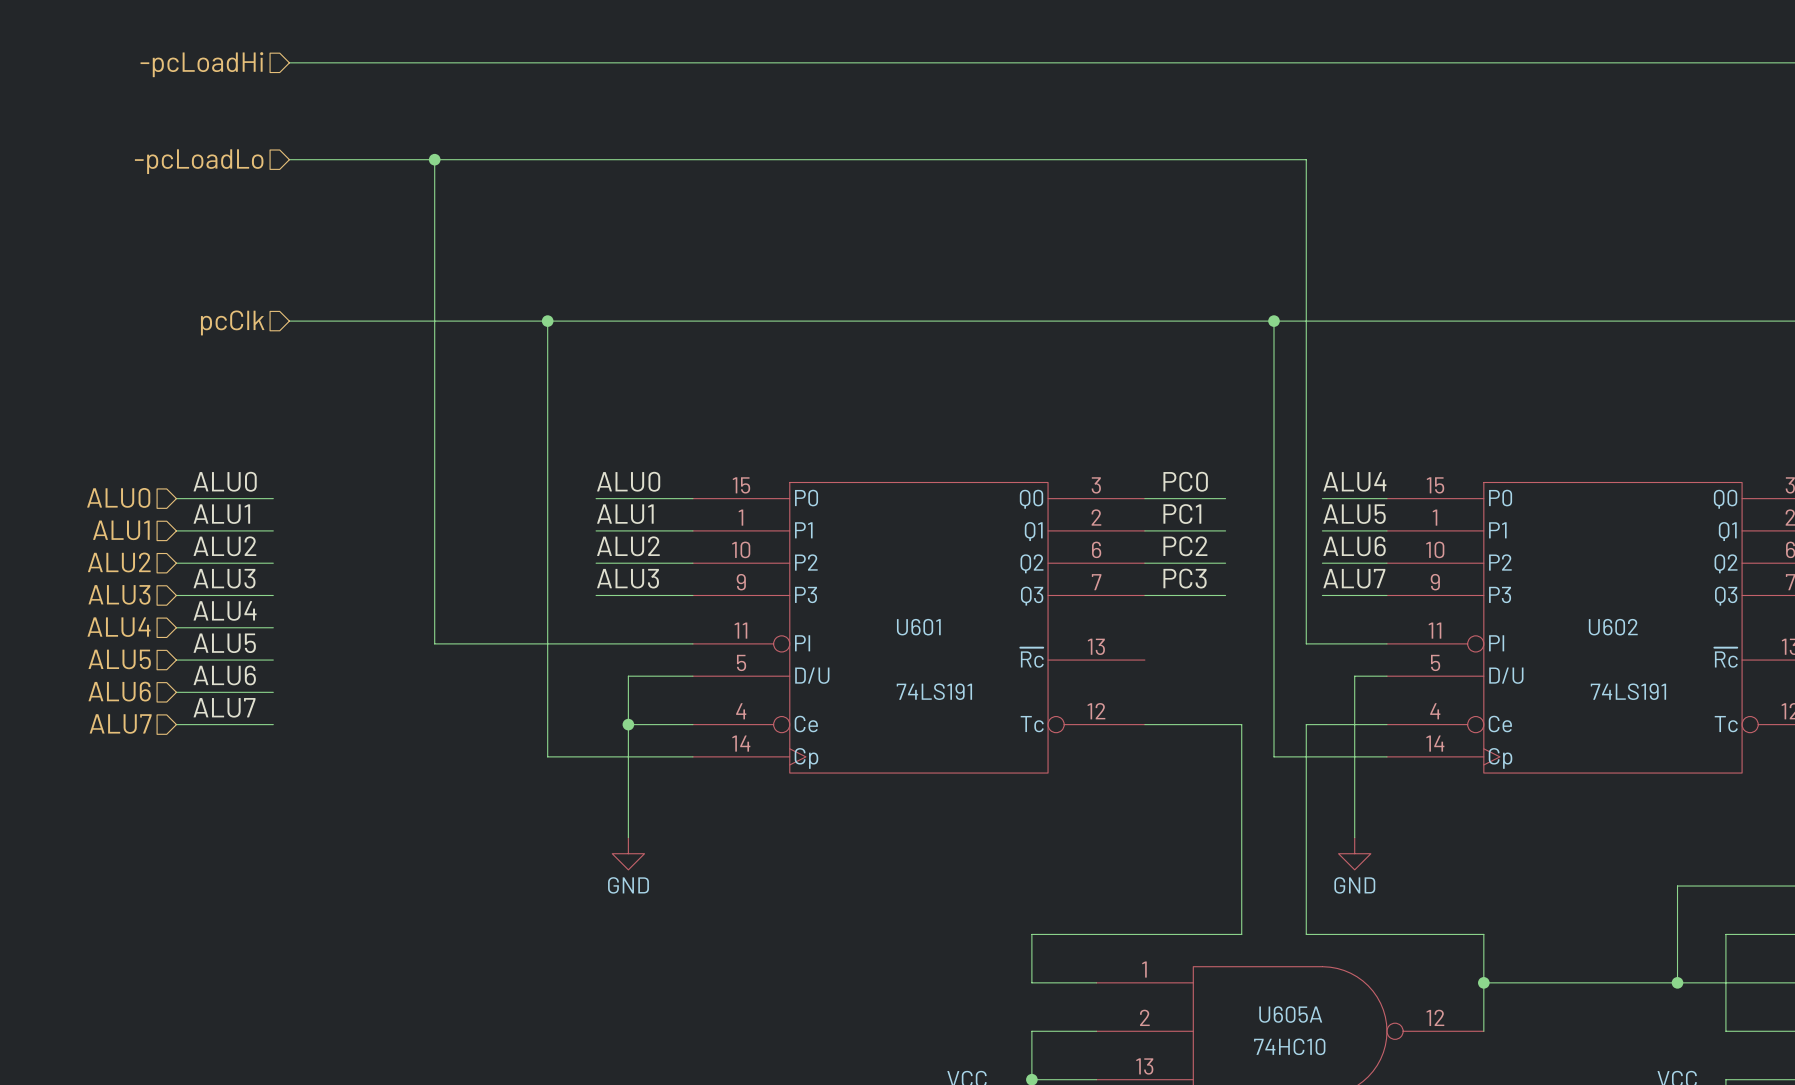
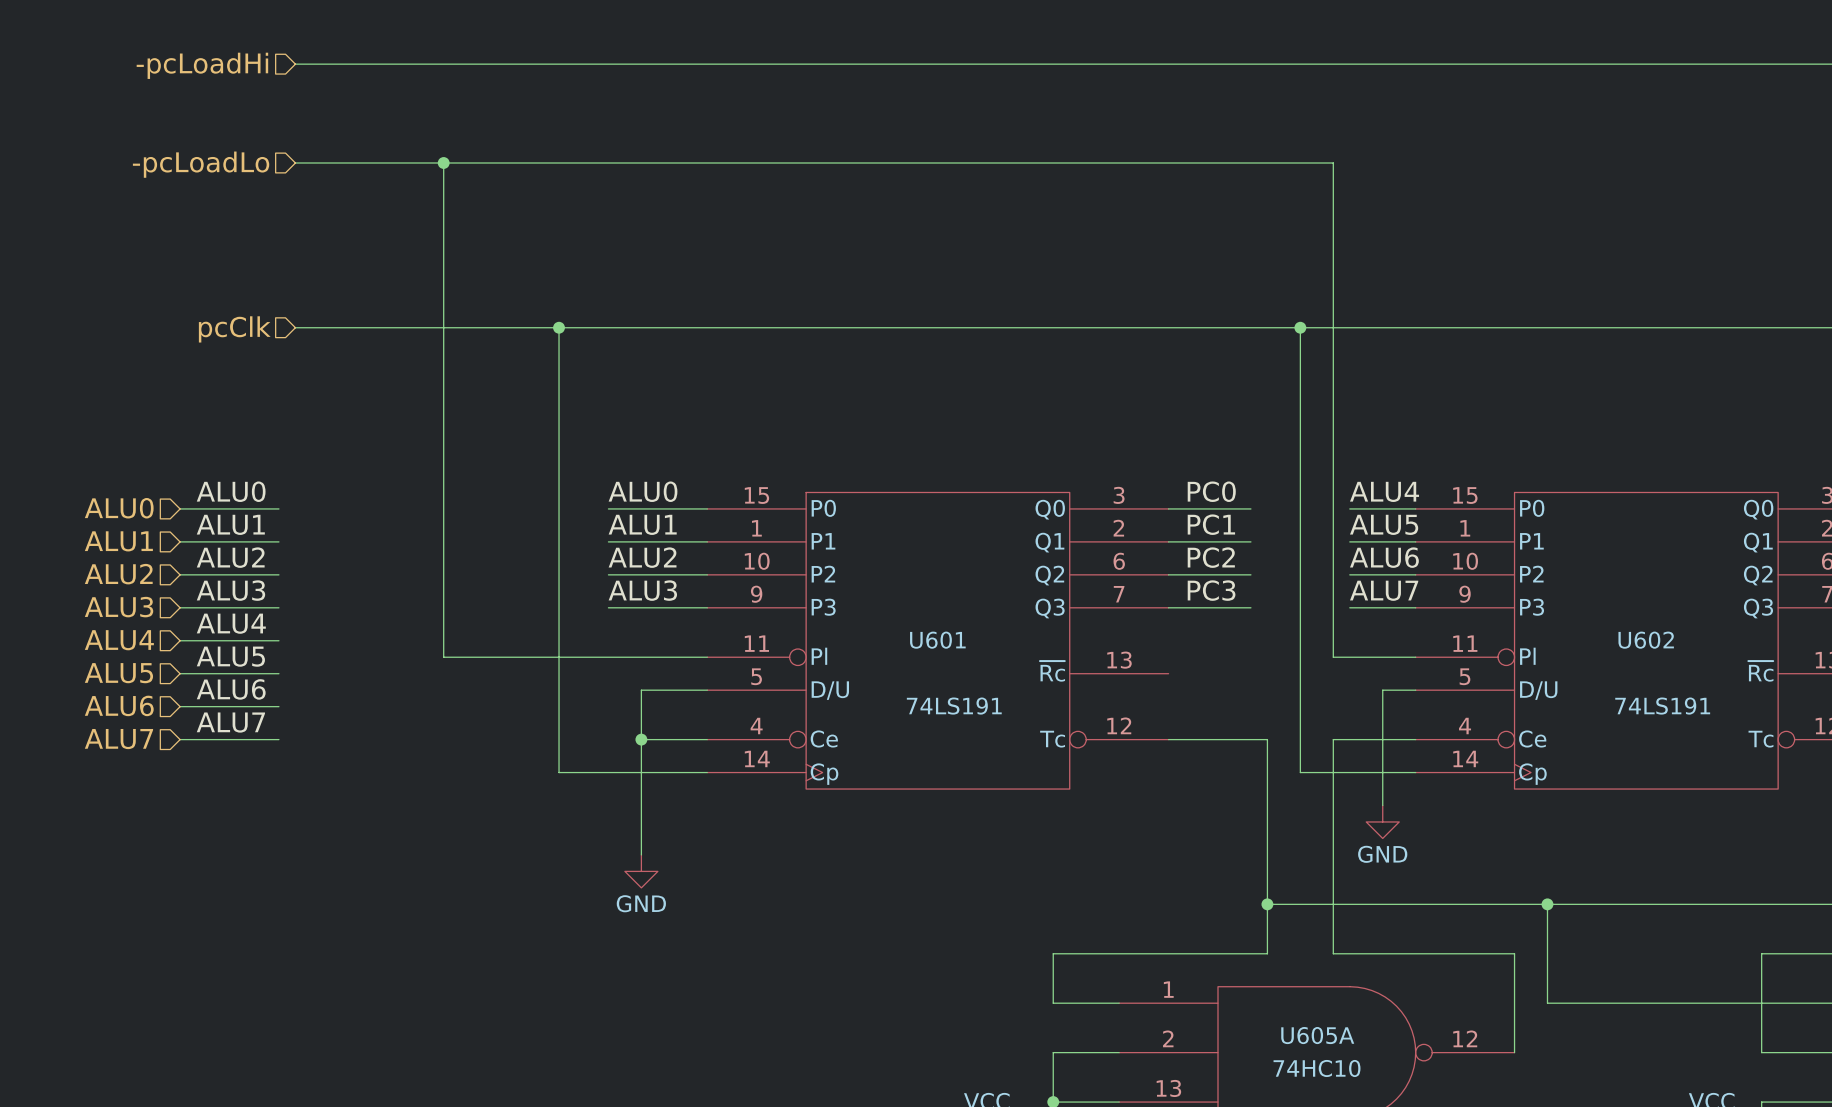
wire: (1354, 789) (1354, 837) -> none
power symbol position: GND (1354, 853) -> GND (1382, 821)
junction: none -> (1267, 904)
junction: none -> (1547, 904)
wire: (1677, 886) (1677, 982) -> (1712, 904) (1267, 904)
wire: (1483, 982) (1516, 982) -> (1547, 904) (1547, 1003)
junction: (1483, 982) -> none
junction: (1677, 982) -> none

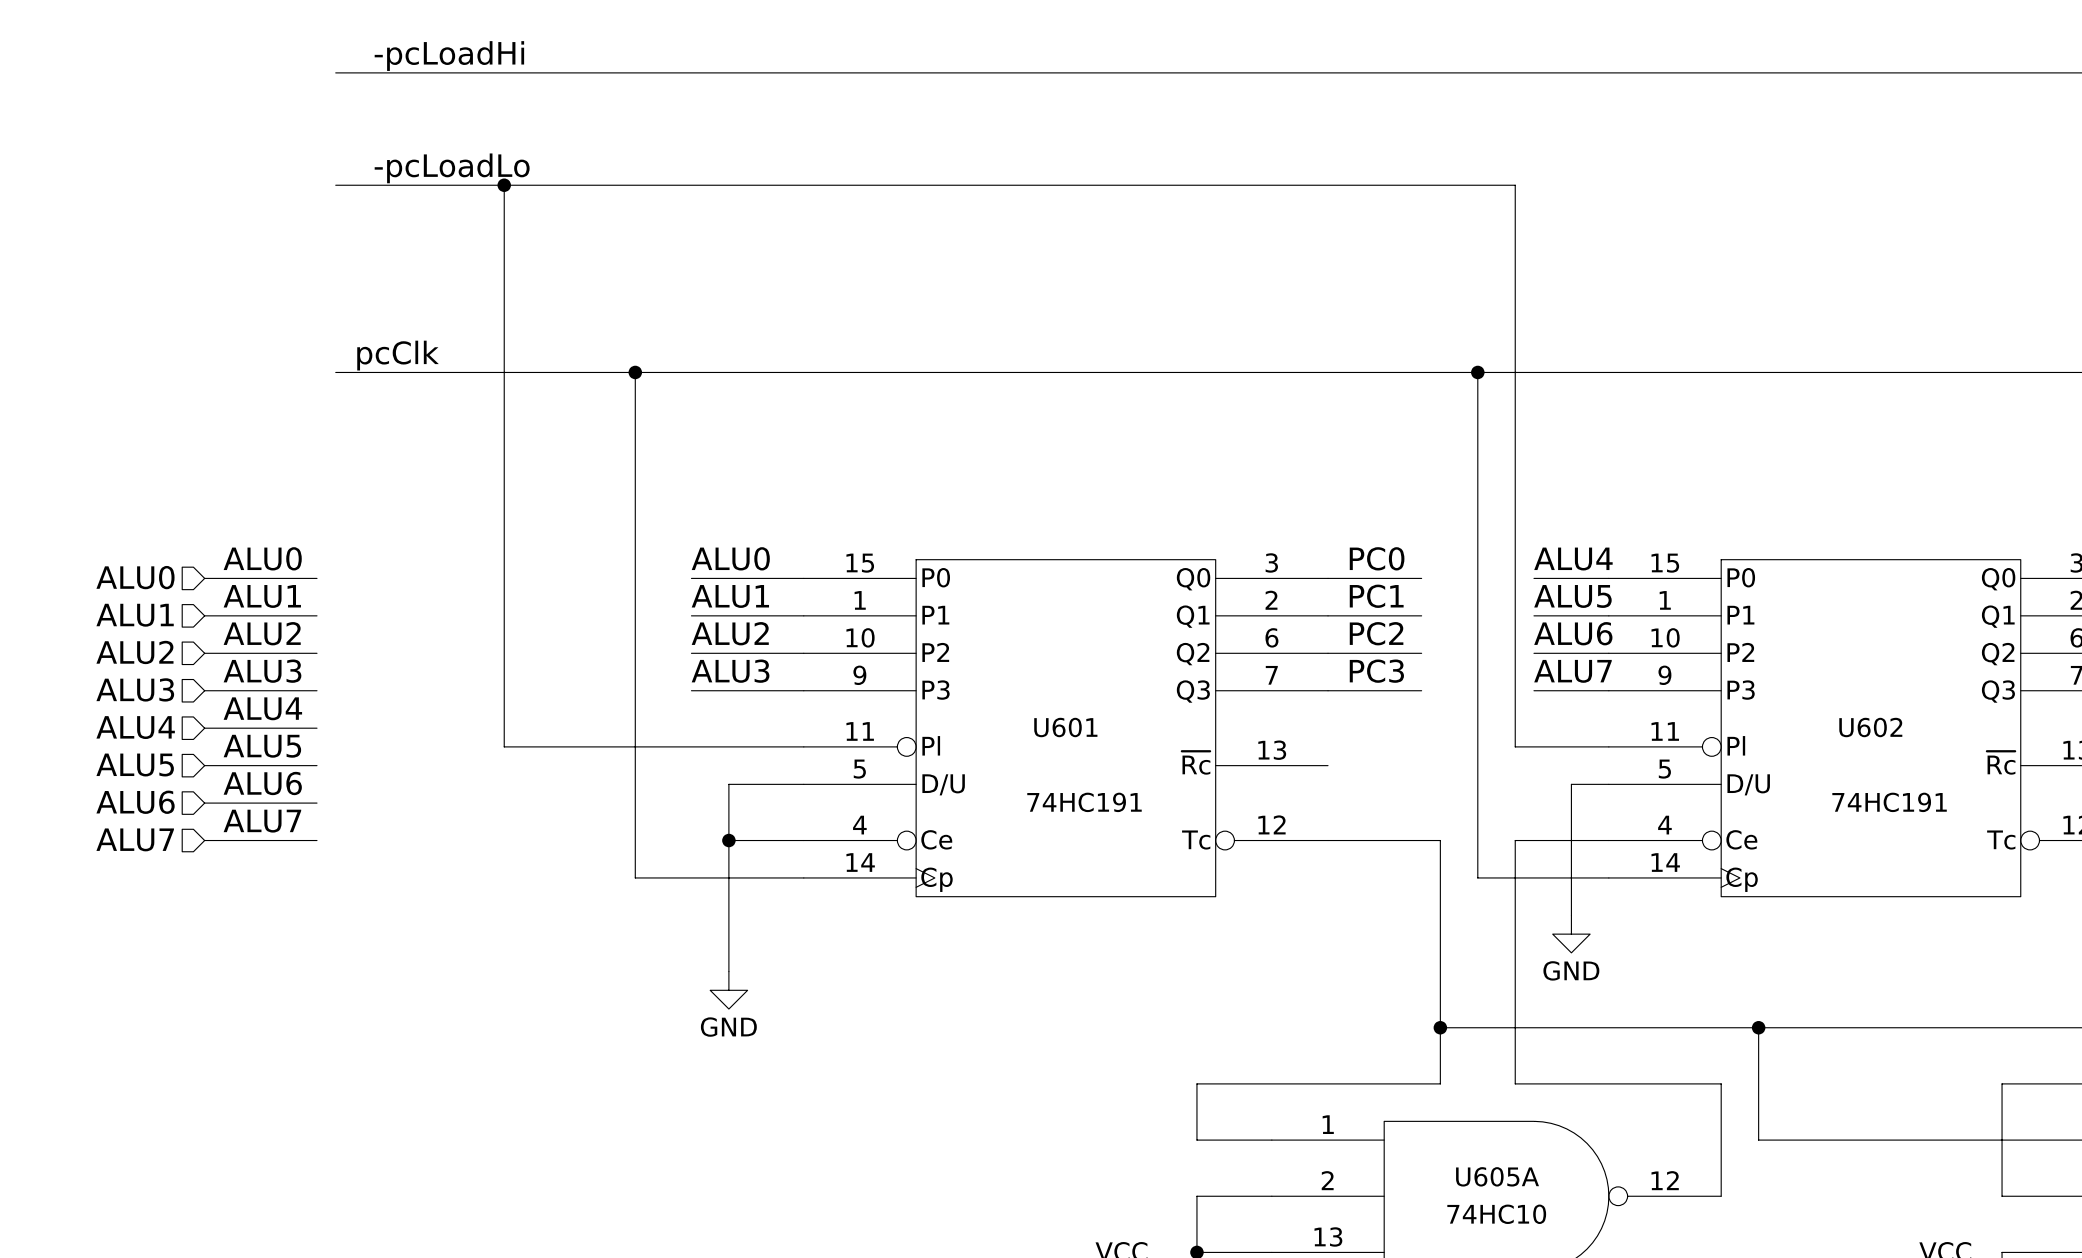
label: none -> -pcLoadHi (449, 56)
hierarchical label: -pcLoadHi (202, 65) -> none
label: none -> -pcLoadLo (452, 168)
hierarchical label: -pcLoadLo (201, 164) -> none
label: none -> pcClk (398, 355)
hierarchical label: pcClk (234, 329) -> none
U601 value: 74LS191 (954, 706) -> 74HC191 (1084, 802)
U602 value: 74LS191 (1662, 706) -> 74HC191 (1889, 802)

